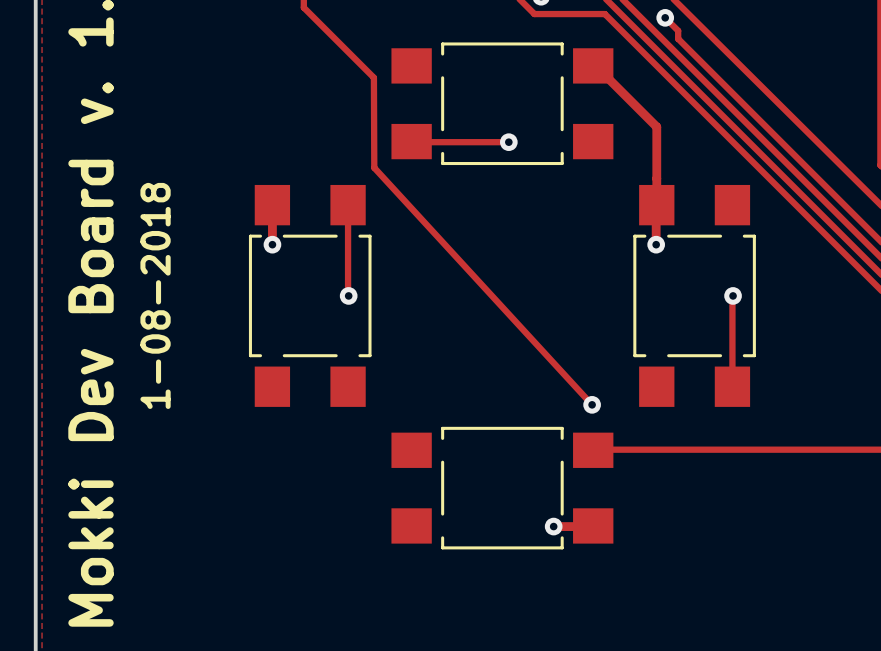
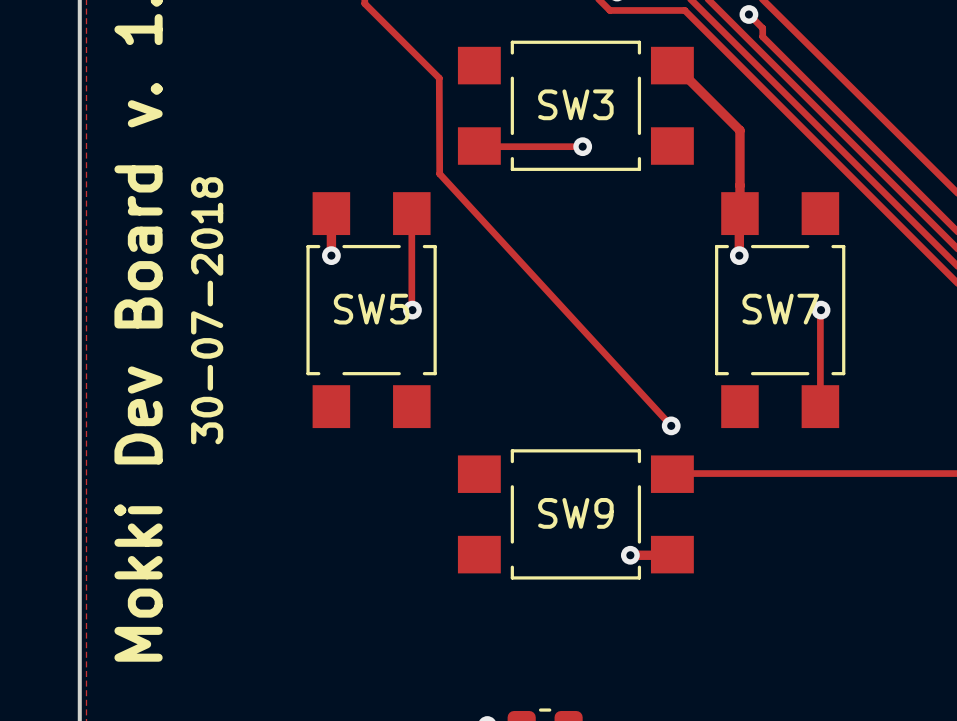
SW3 name: none -> SW3 (575, 104)
SW5 name: none -> SW5 (371, 309)
SW7 name: none -> SW7 (780, 309)
text: 1-08-2018 (155, 295) -> 30-07-2018 (207, 310)
SW9 name: none -> SW9 (575, 513)

